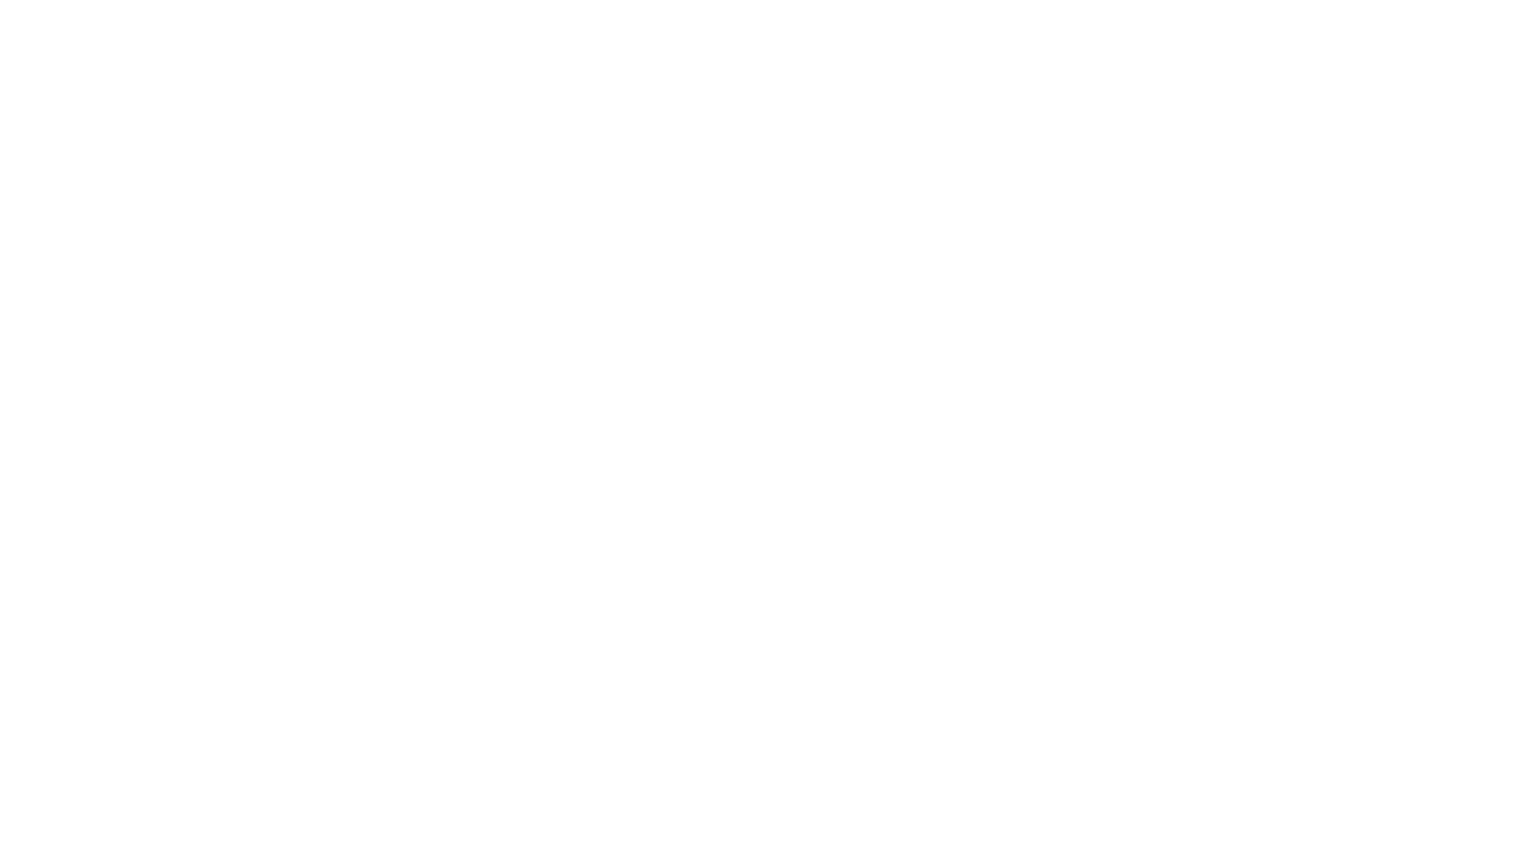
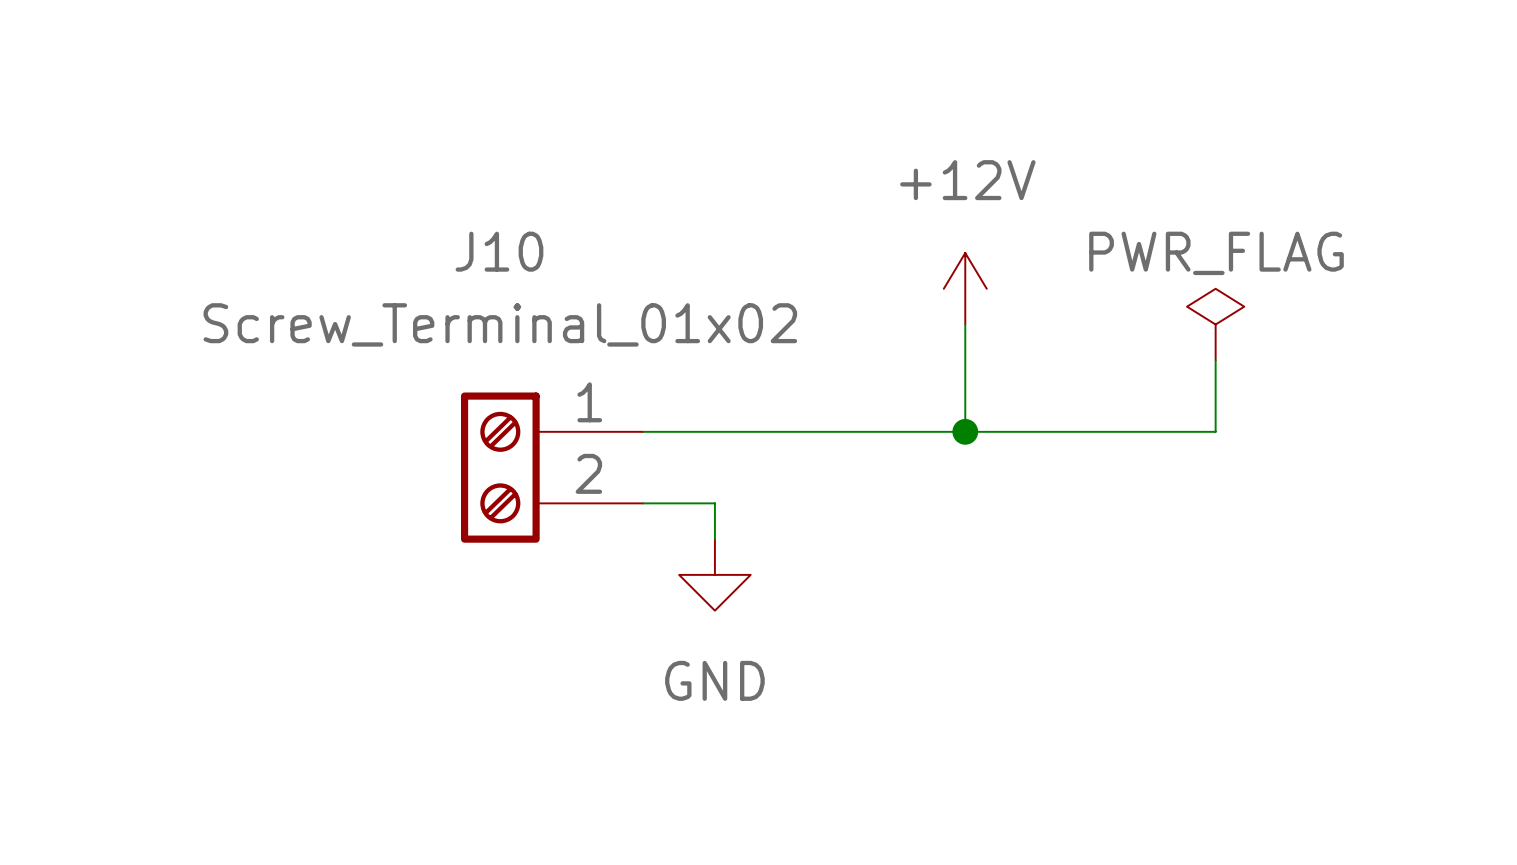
power symbol: none -> +12V (965, 288)
wire: none -> (965, 324) (965, 431)
power symbol: none -> PWR_FLAG (1215, 324)
wire: none -> (1215, 360) (1215, 431) (643, 431)
junction: none -> (965, 431)
J10: none -> Screw_Terminal_01x02 (552, 467)
wire: none -> (643, 503) (714, 503) (714, 539)
power symbol: none -> GND (714, 574)

